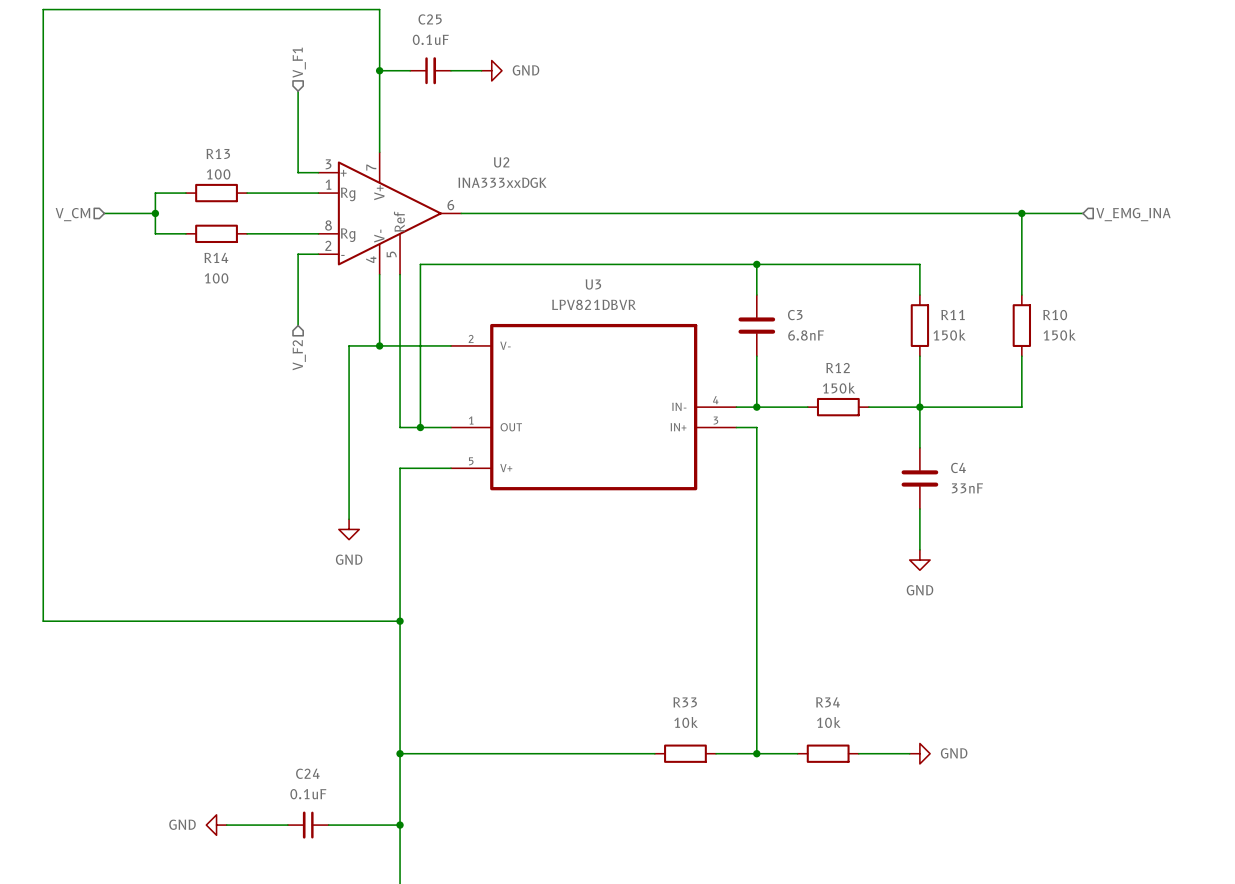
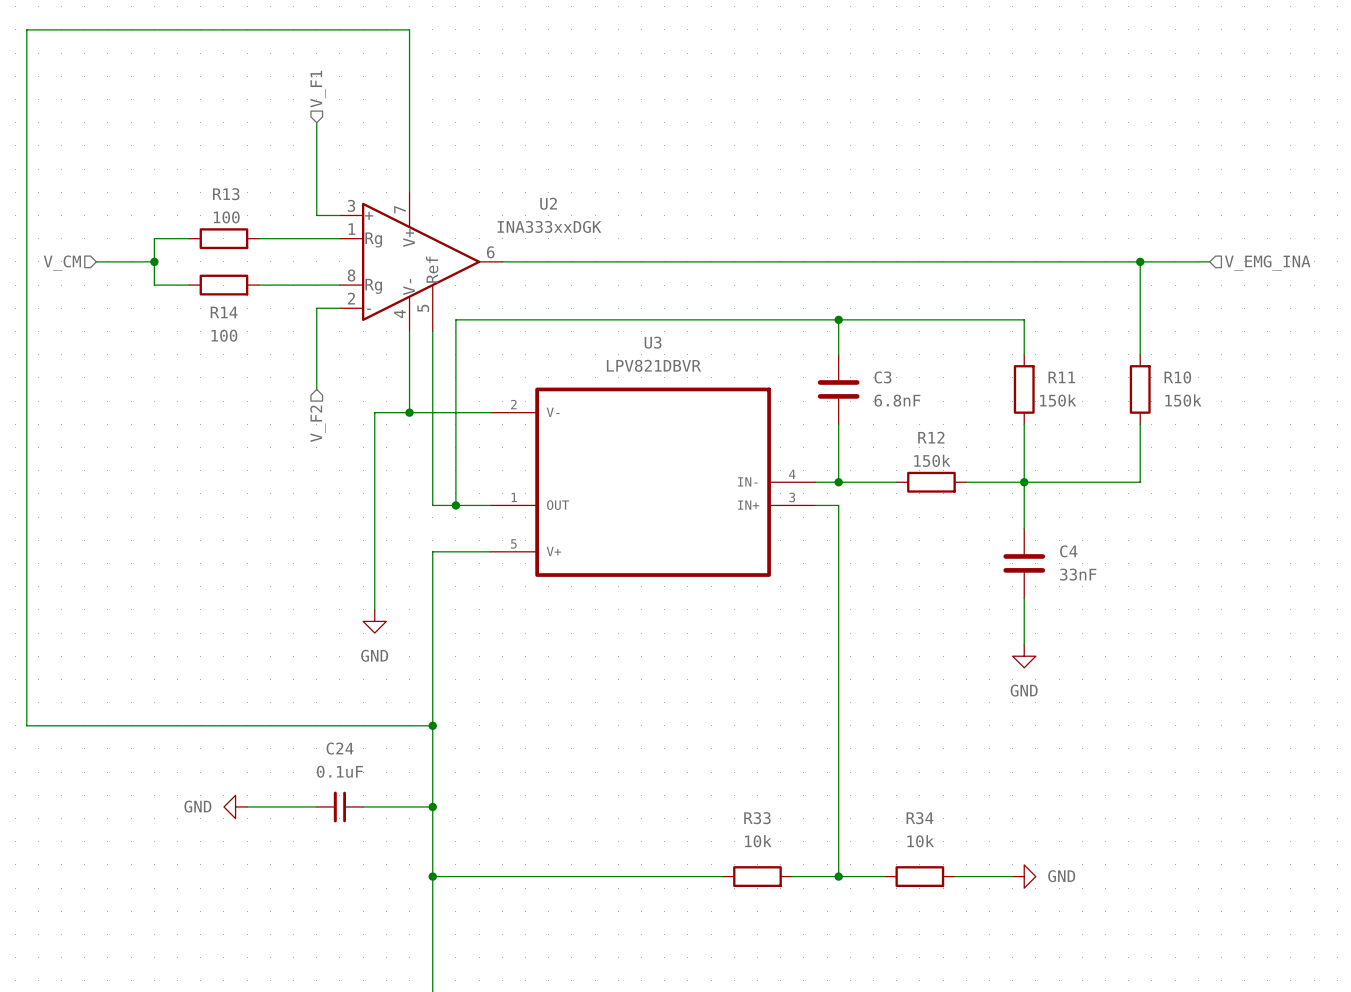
wire: (379, 70) (410, 70) -> none
junction: (379, 70) -> none
C25: 0.1uF (430, 70) -> none
wire: (450, 70) (481, 70) -> none
power symbol: GND (491, 70) -> none
wire: none -> (363, 806) (432, 806)
junction: none -> (432, 806)
power symbol position: GND (216, 825) -> GND (235, 806)
wire: (226, 825) (287, 825) -> (247, 806) (316, 806)
C24 position: (308, 825) -> (339, 806)
wire: (328, 825) (400, 825) -> none
junction: (400, 825) -> none

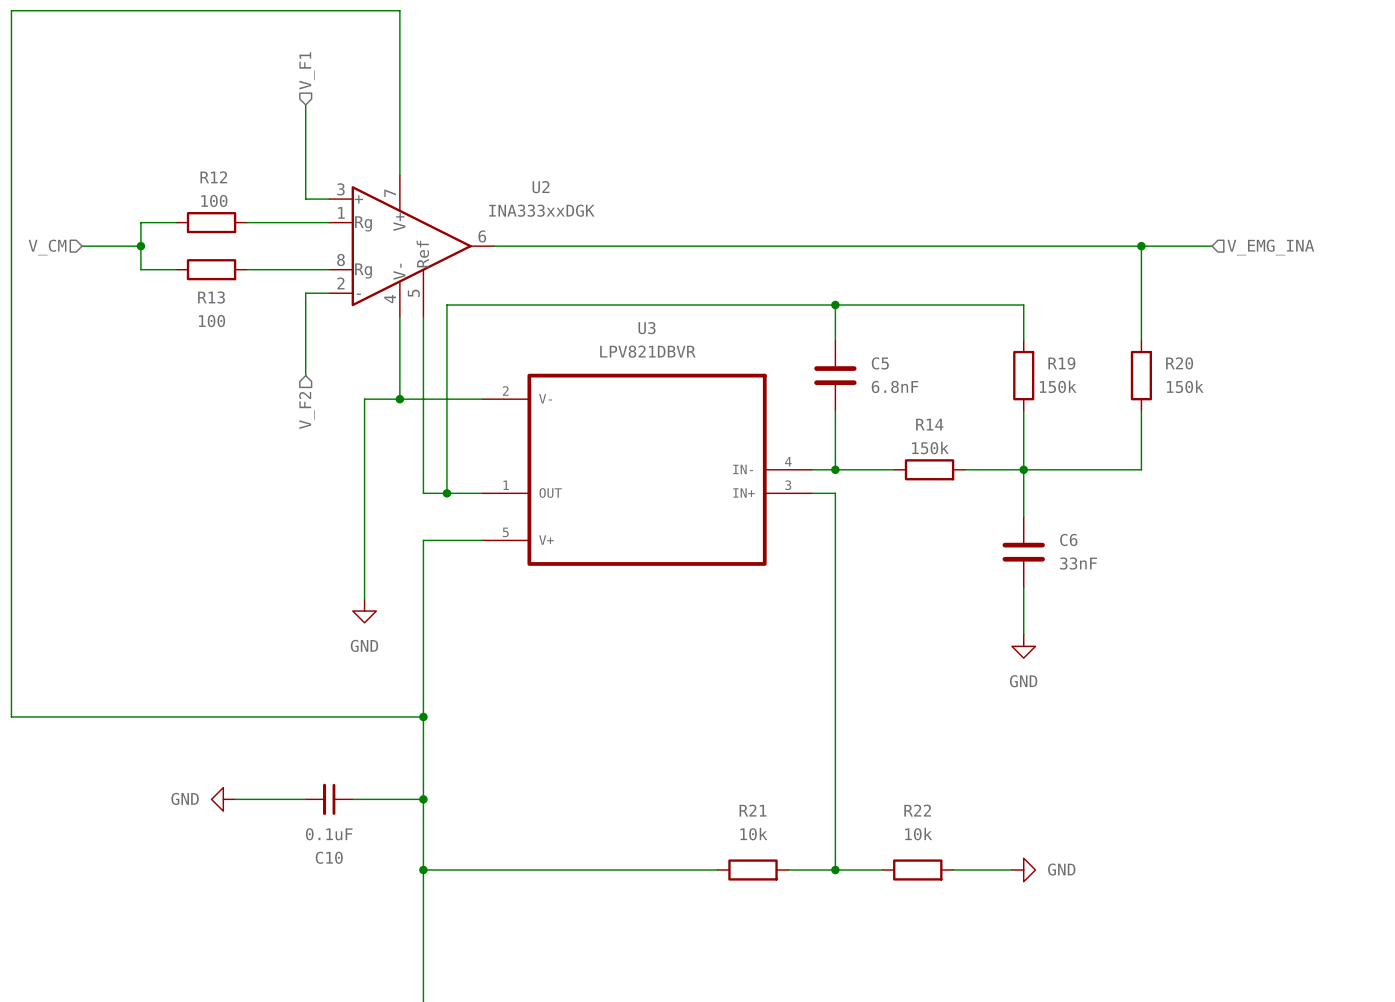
R13 name: R13 (226, 194) -> R12 (213, 177)
R14 name: R14 (224, 312) -> R13 (211, 297)
C3 name: C3 (882, 377) -> C5 (880, 363)
R11 name: R11 (1061, 377) -> R19 (1061, 363)
R10 name: R10 (1177, 377) -> R20 (1179, 363)
R12 name: R12 (931, 437) -> R14 (929, 424)
C4 name: C4 (1068, 551) -> C6 (1068, 539)
C24 name: C24 (340, 748) -> C10 (329, 857)
C24 value position: 0.1uF (339, 771) -> 0.1uF (329, 834)
R33 name: R33 (757, 818) -> R21 (753, 810)
R34 name: R34 (920, 818) -> R22 (917, 810)

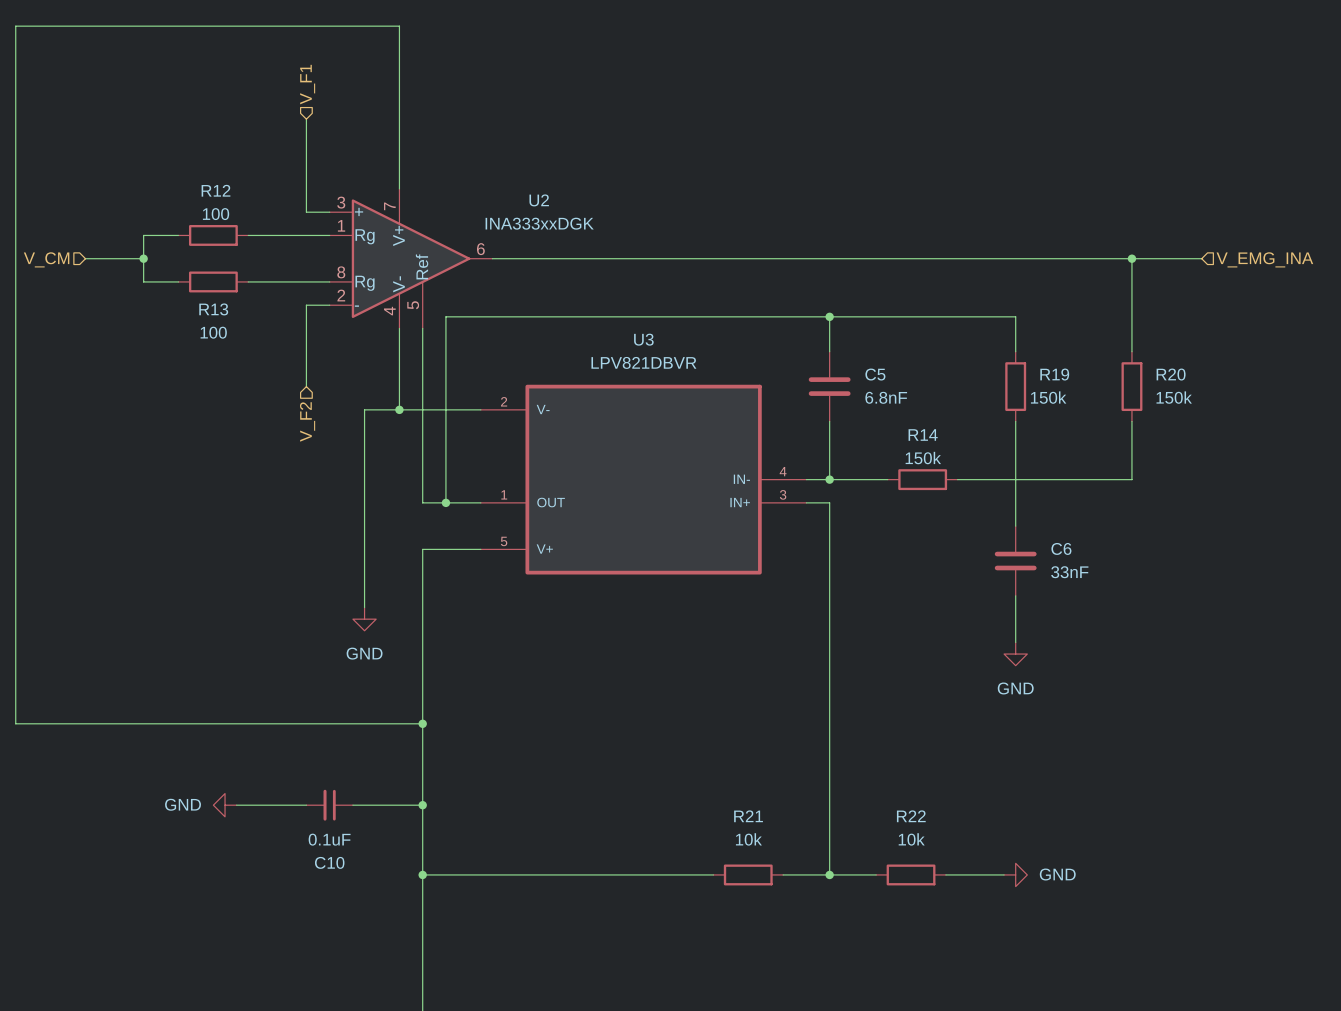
junction: (1023, 469) -> none

